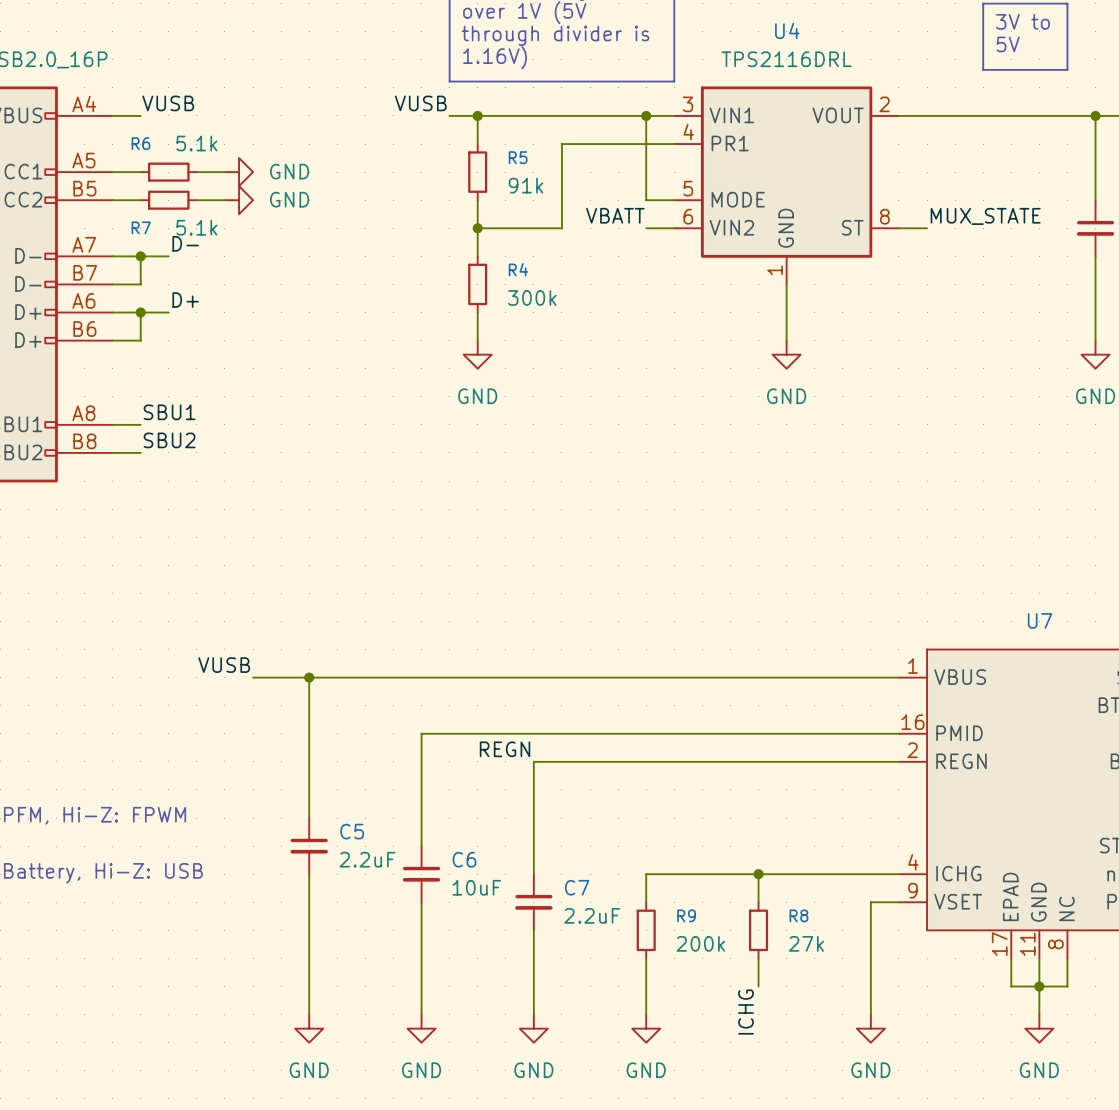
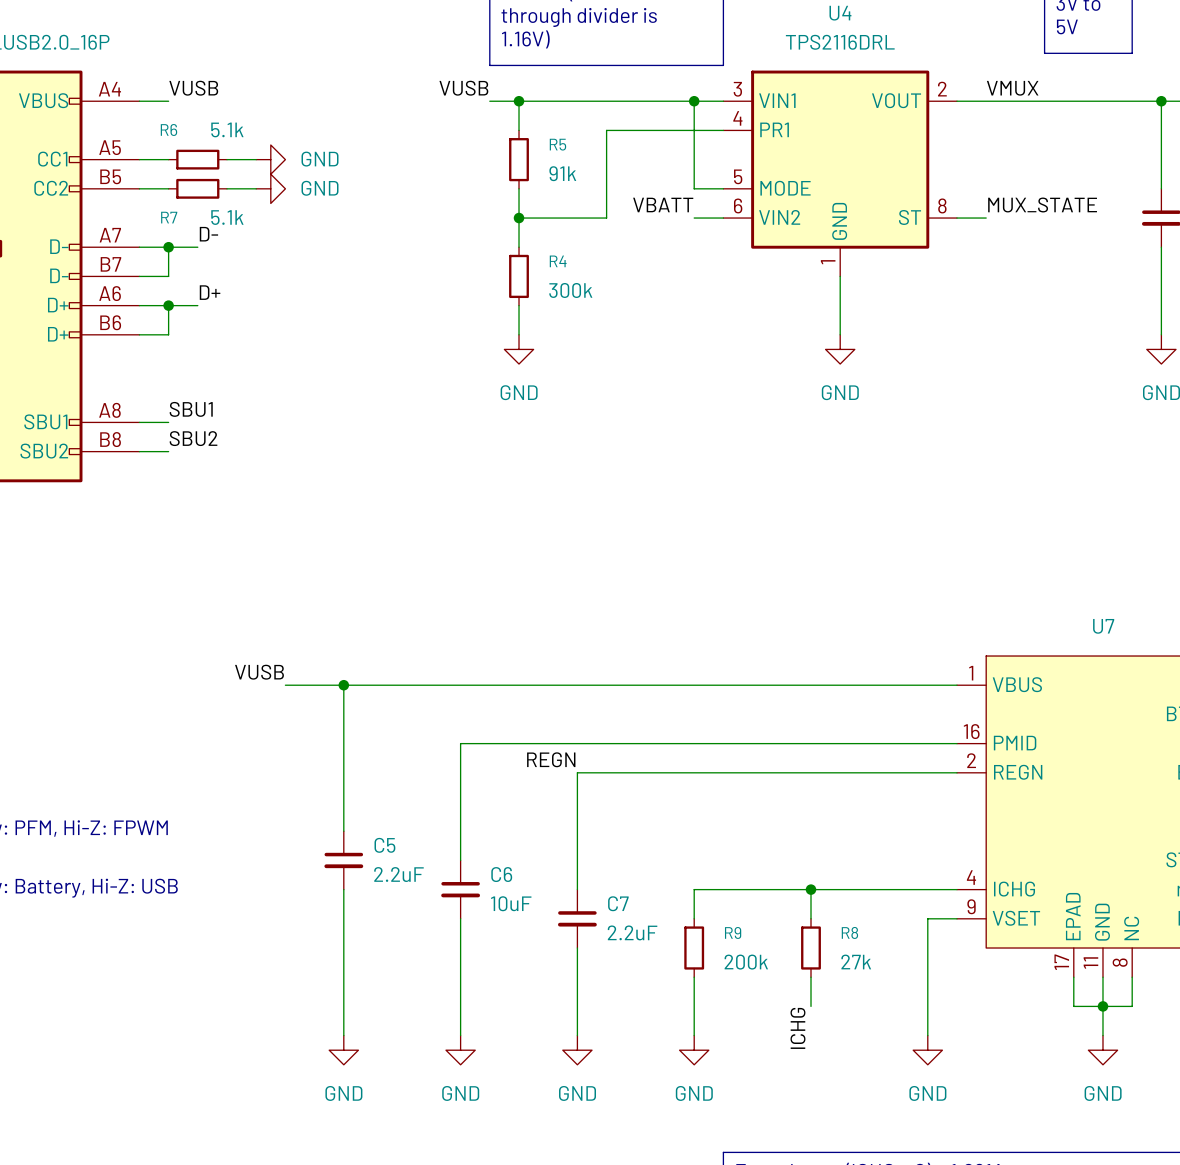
label: none -> VMUX (1012, 88)

